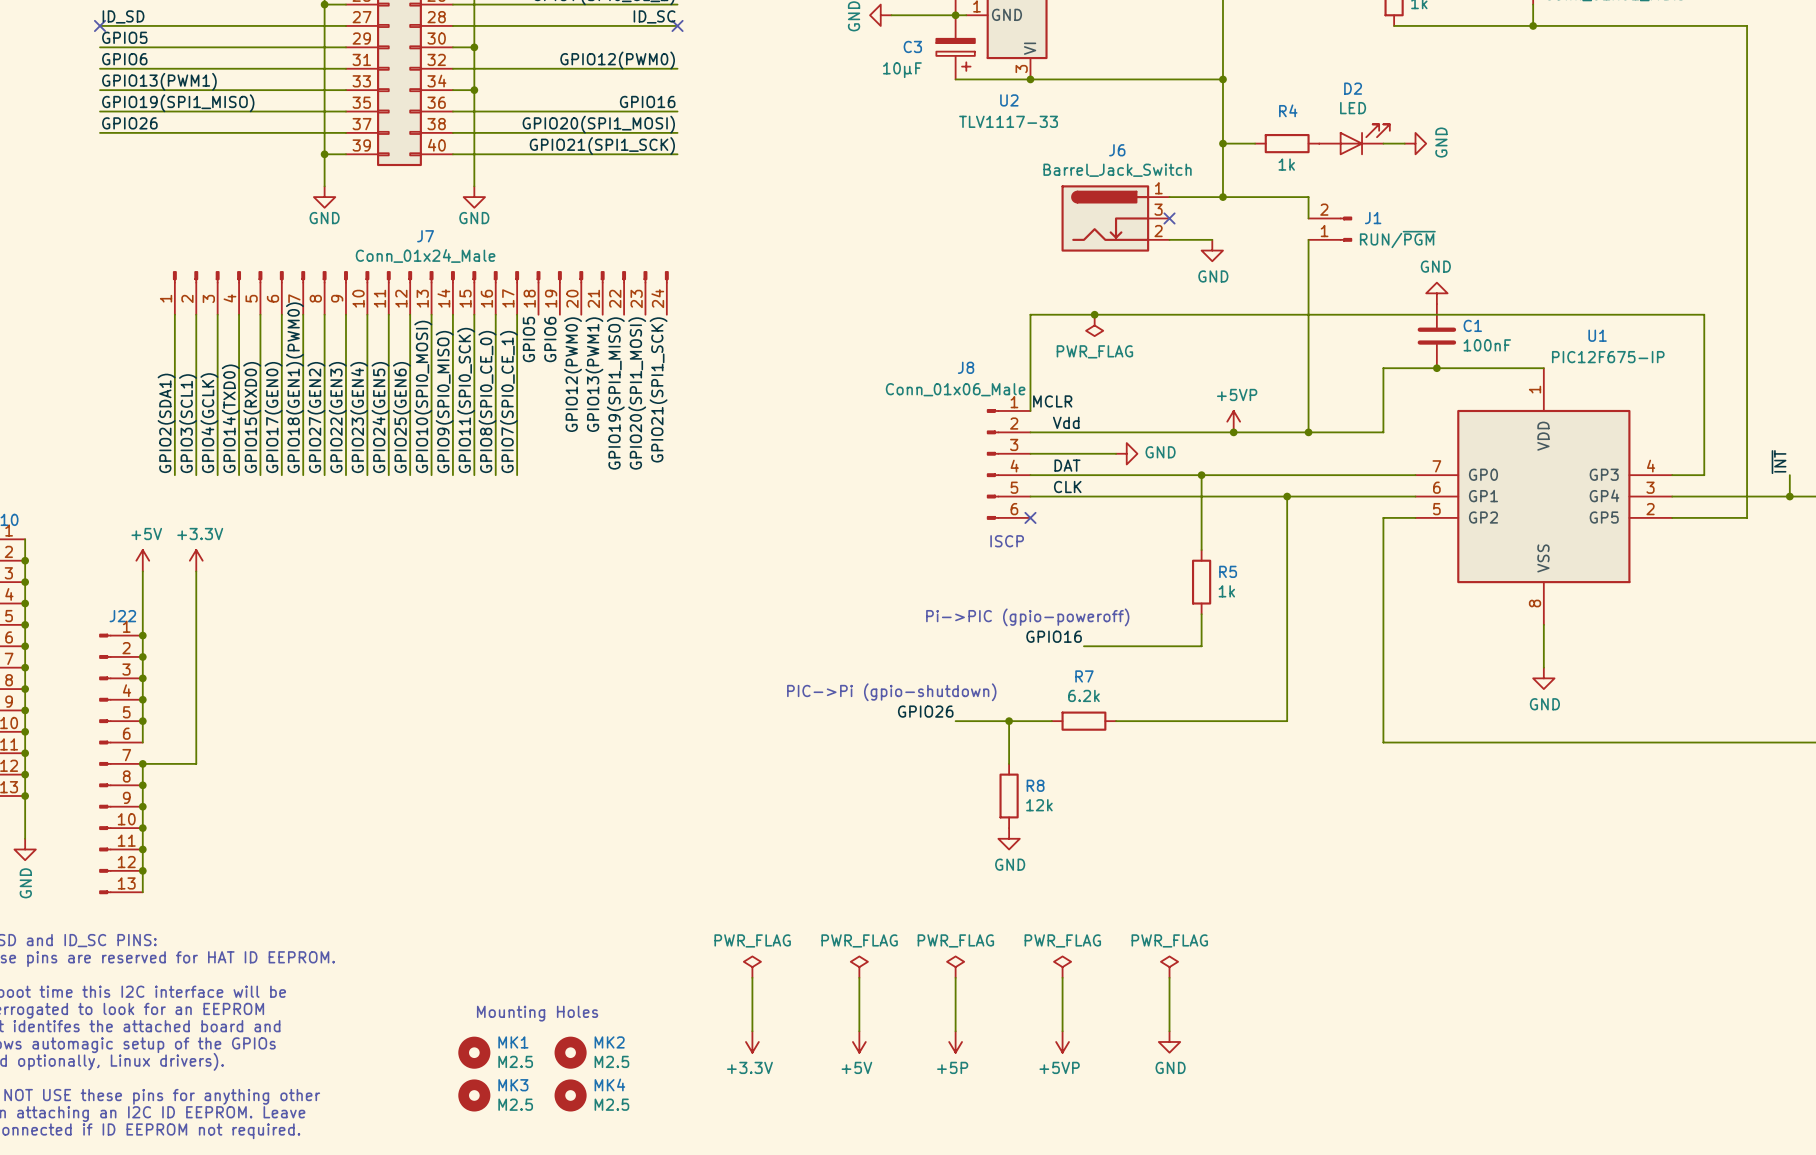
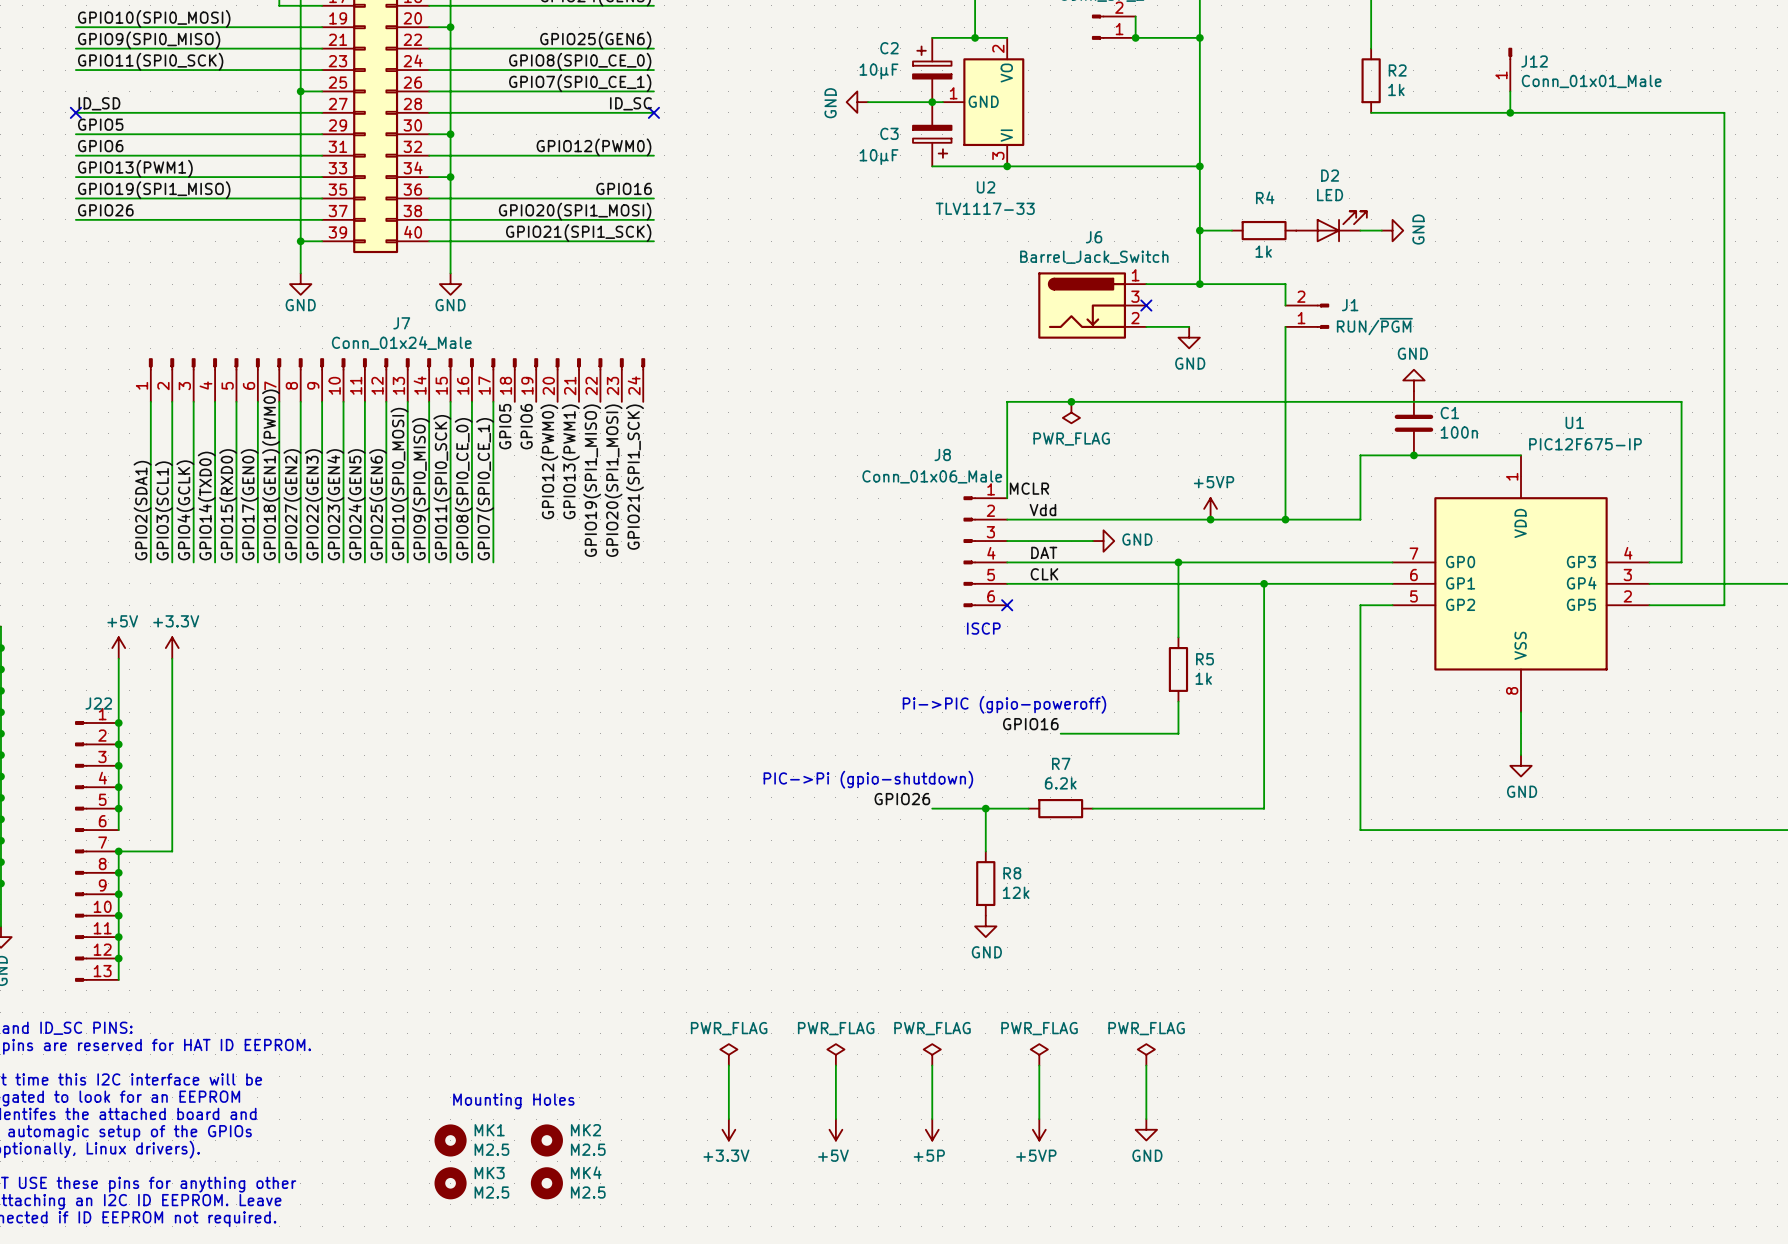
C1 value: 100nF (1487, 345) -> 100n (1459, 432)
label: ~{INT} (1779, 462) -> none
wire: (1789, 475) (1789, 496) -> none
junction: (1789, 496) -> none

